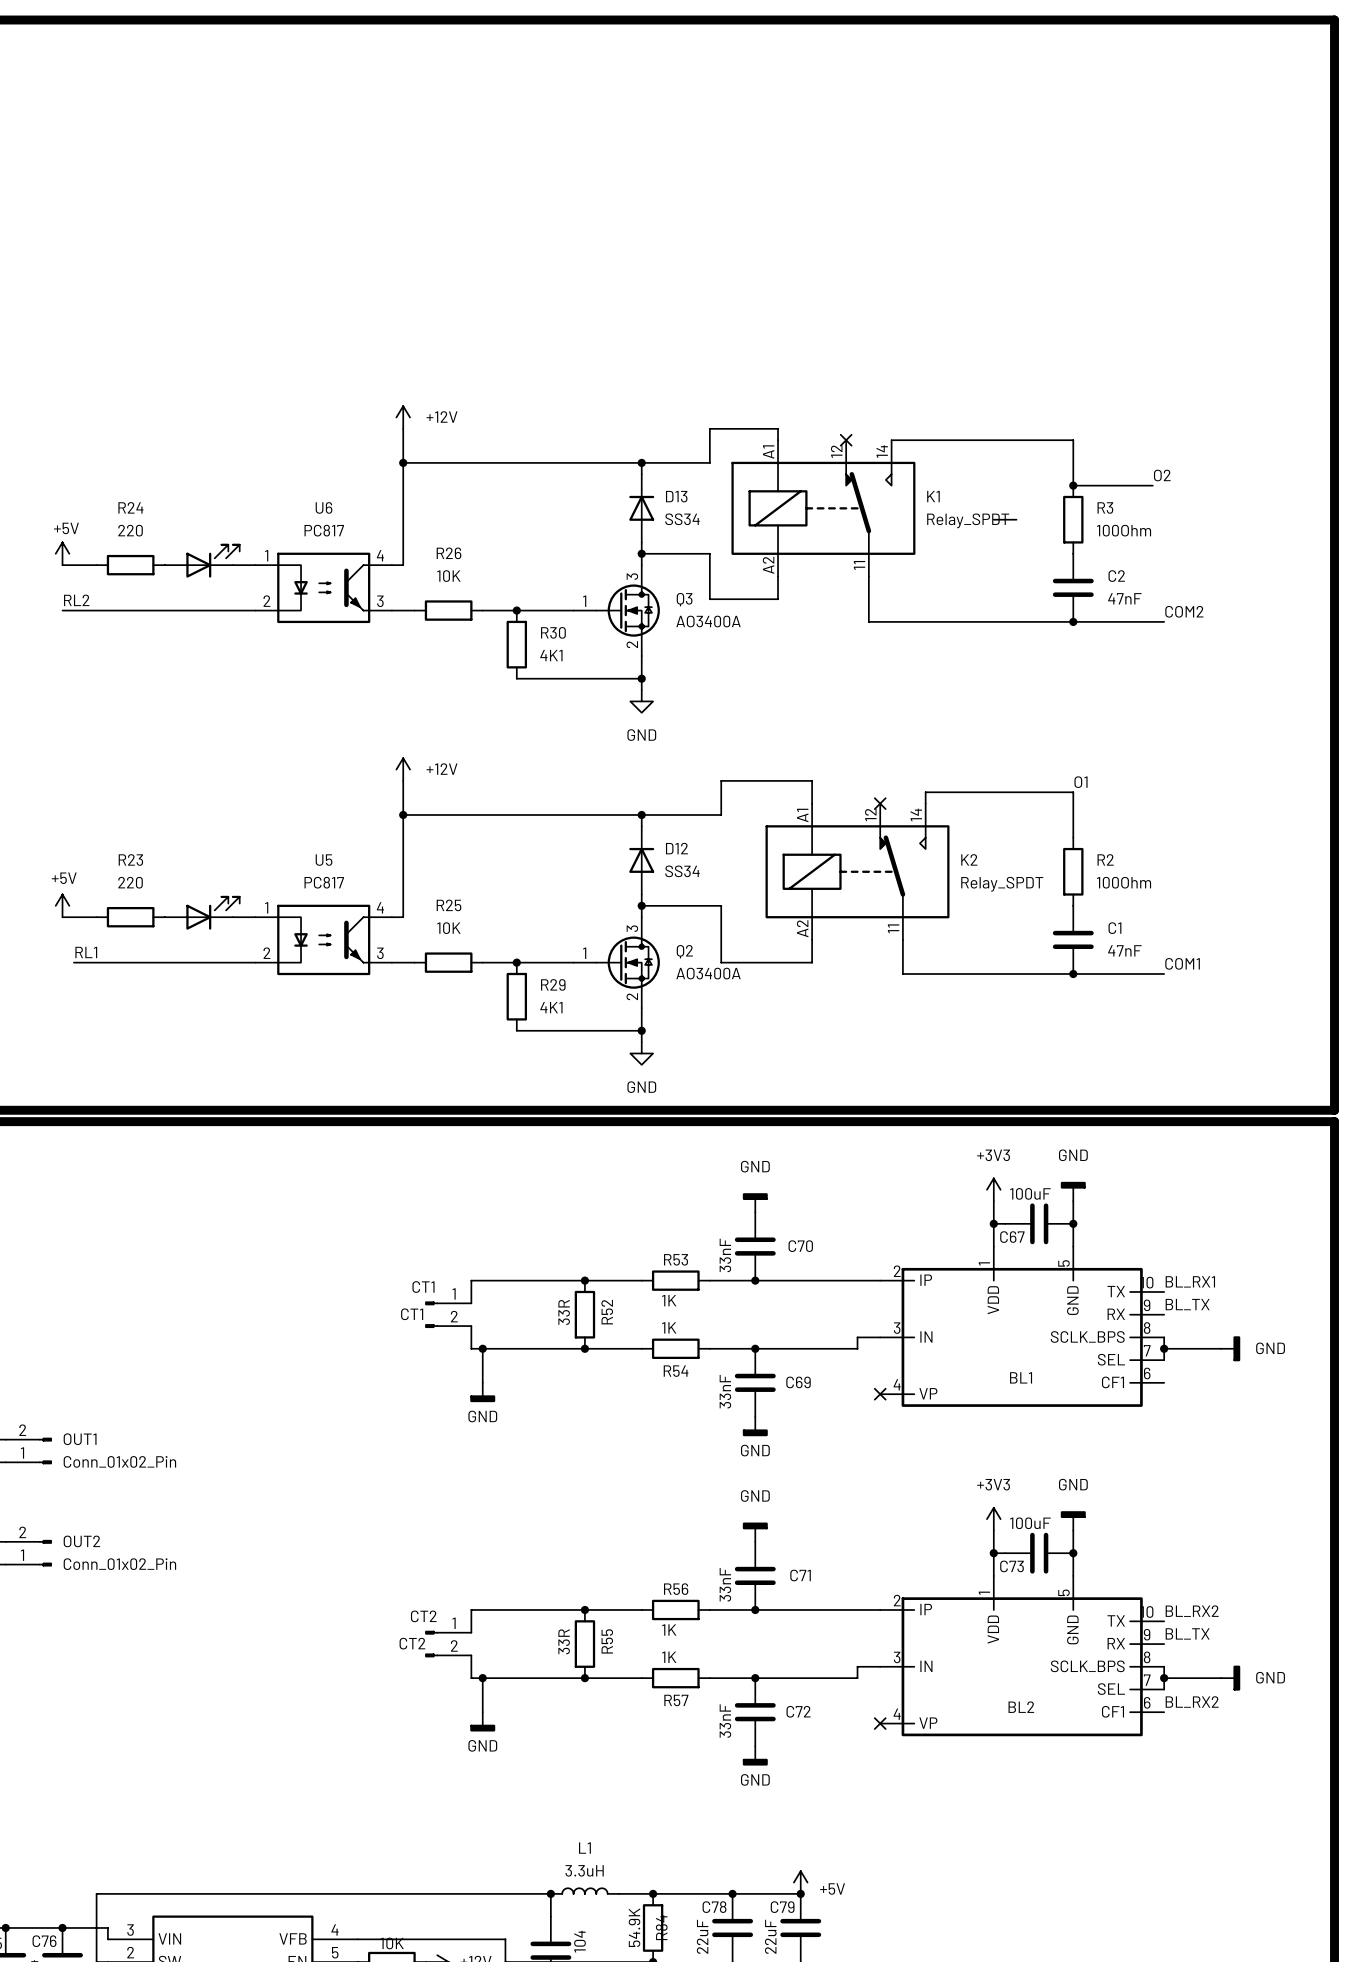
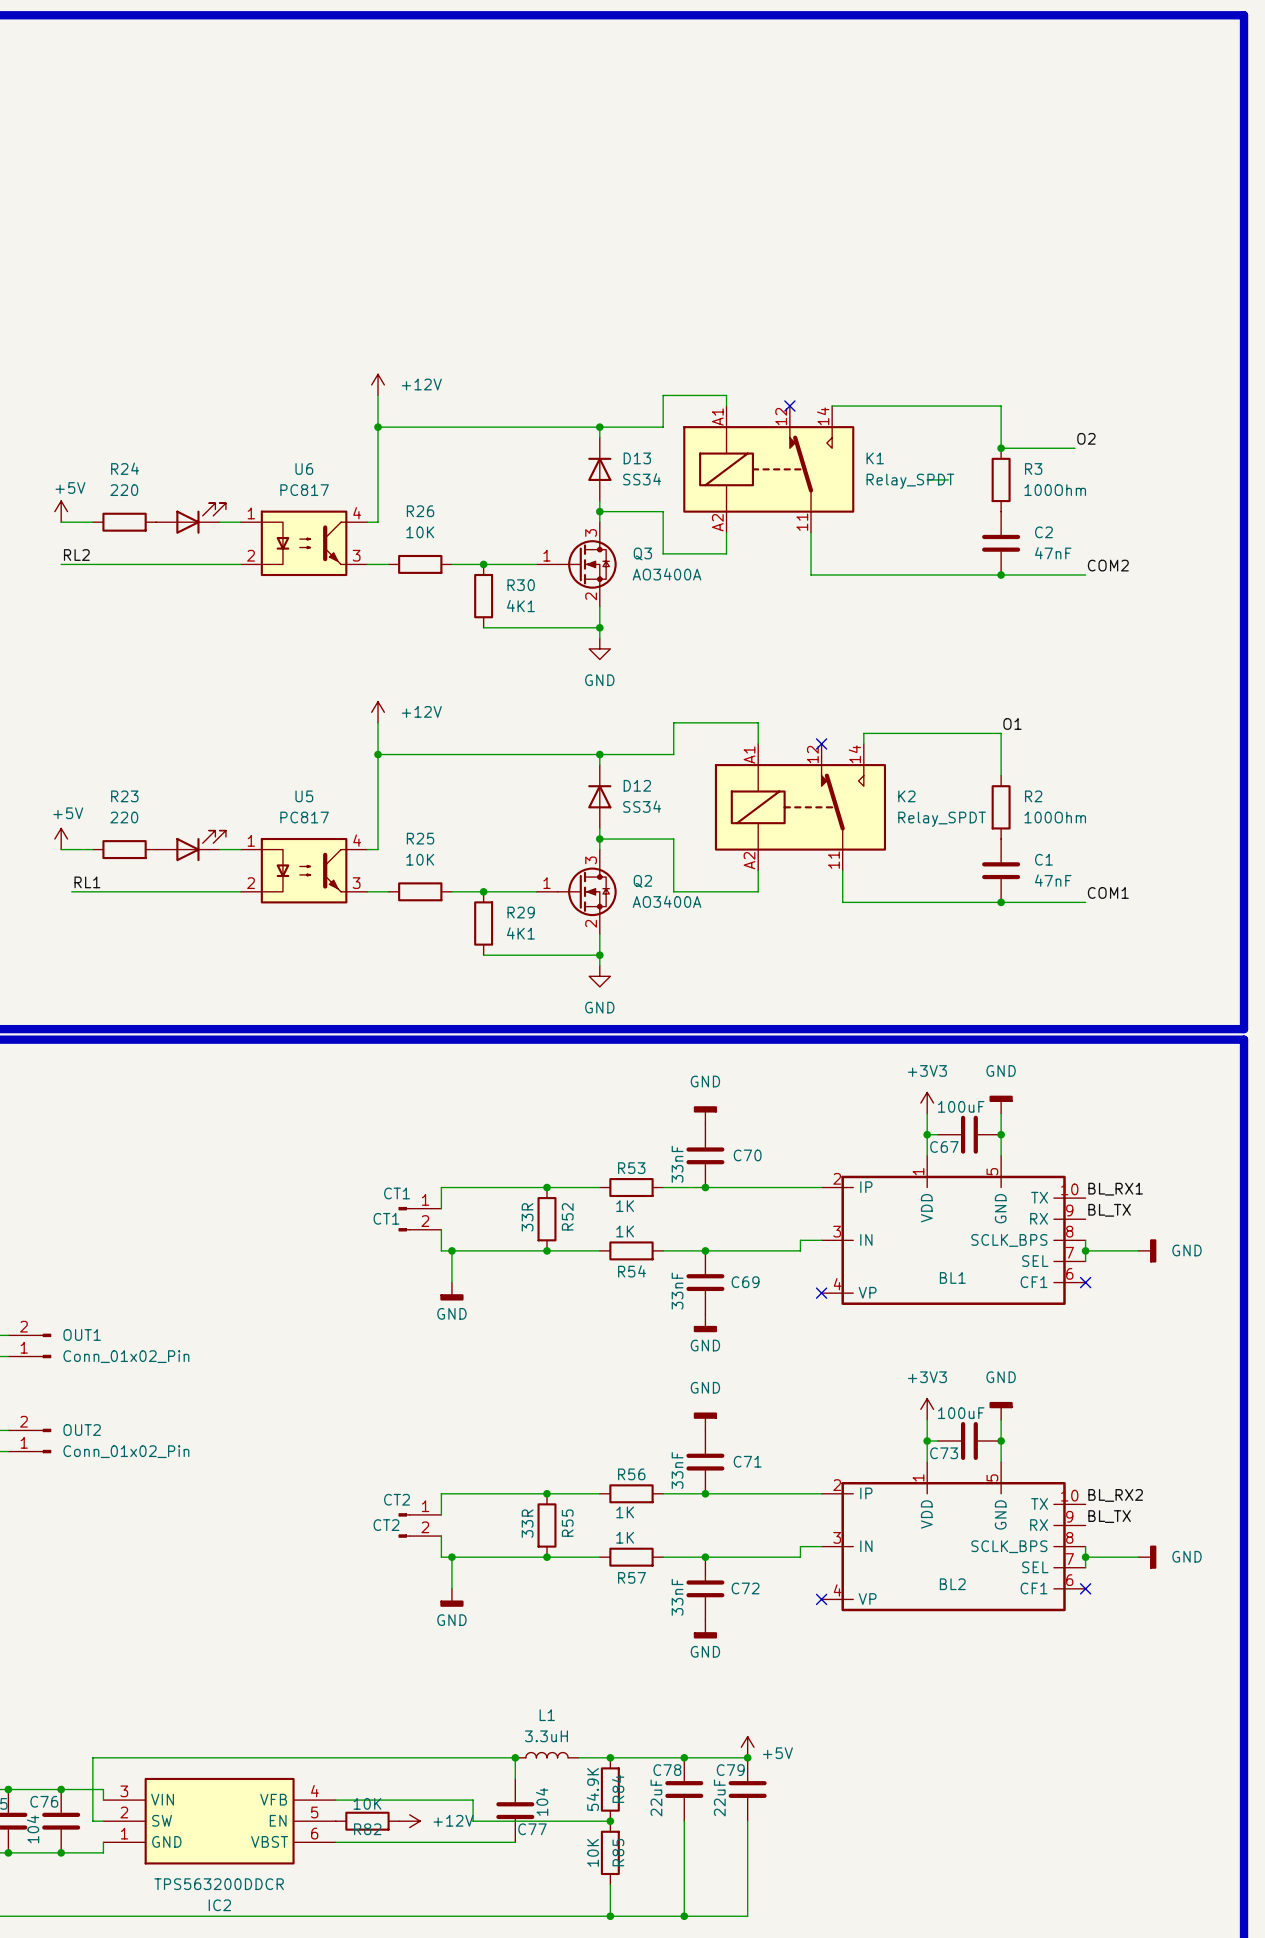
no-connect mark: none -> (1085, 1282)
label: BL_RX2 (1192, 1702) -> none
no-connect mark: none -> (1085, 1588)

